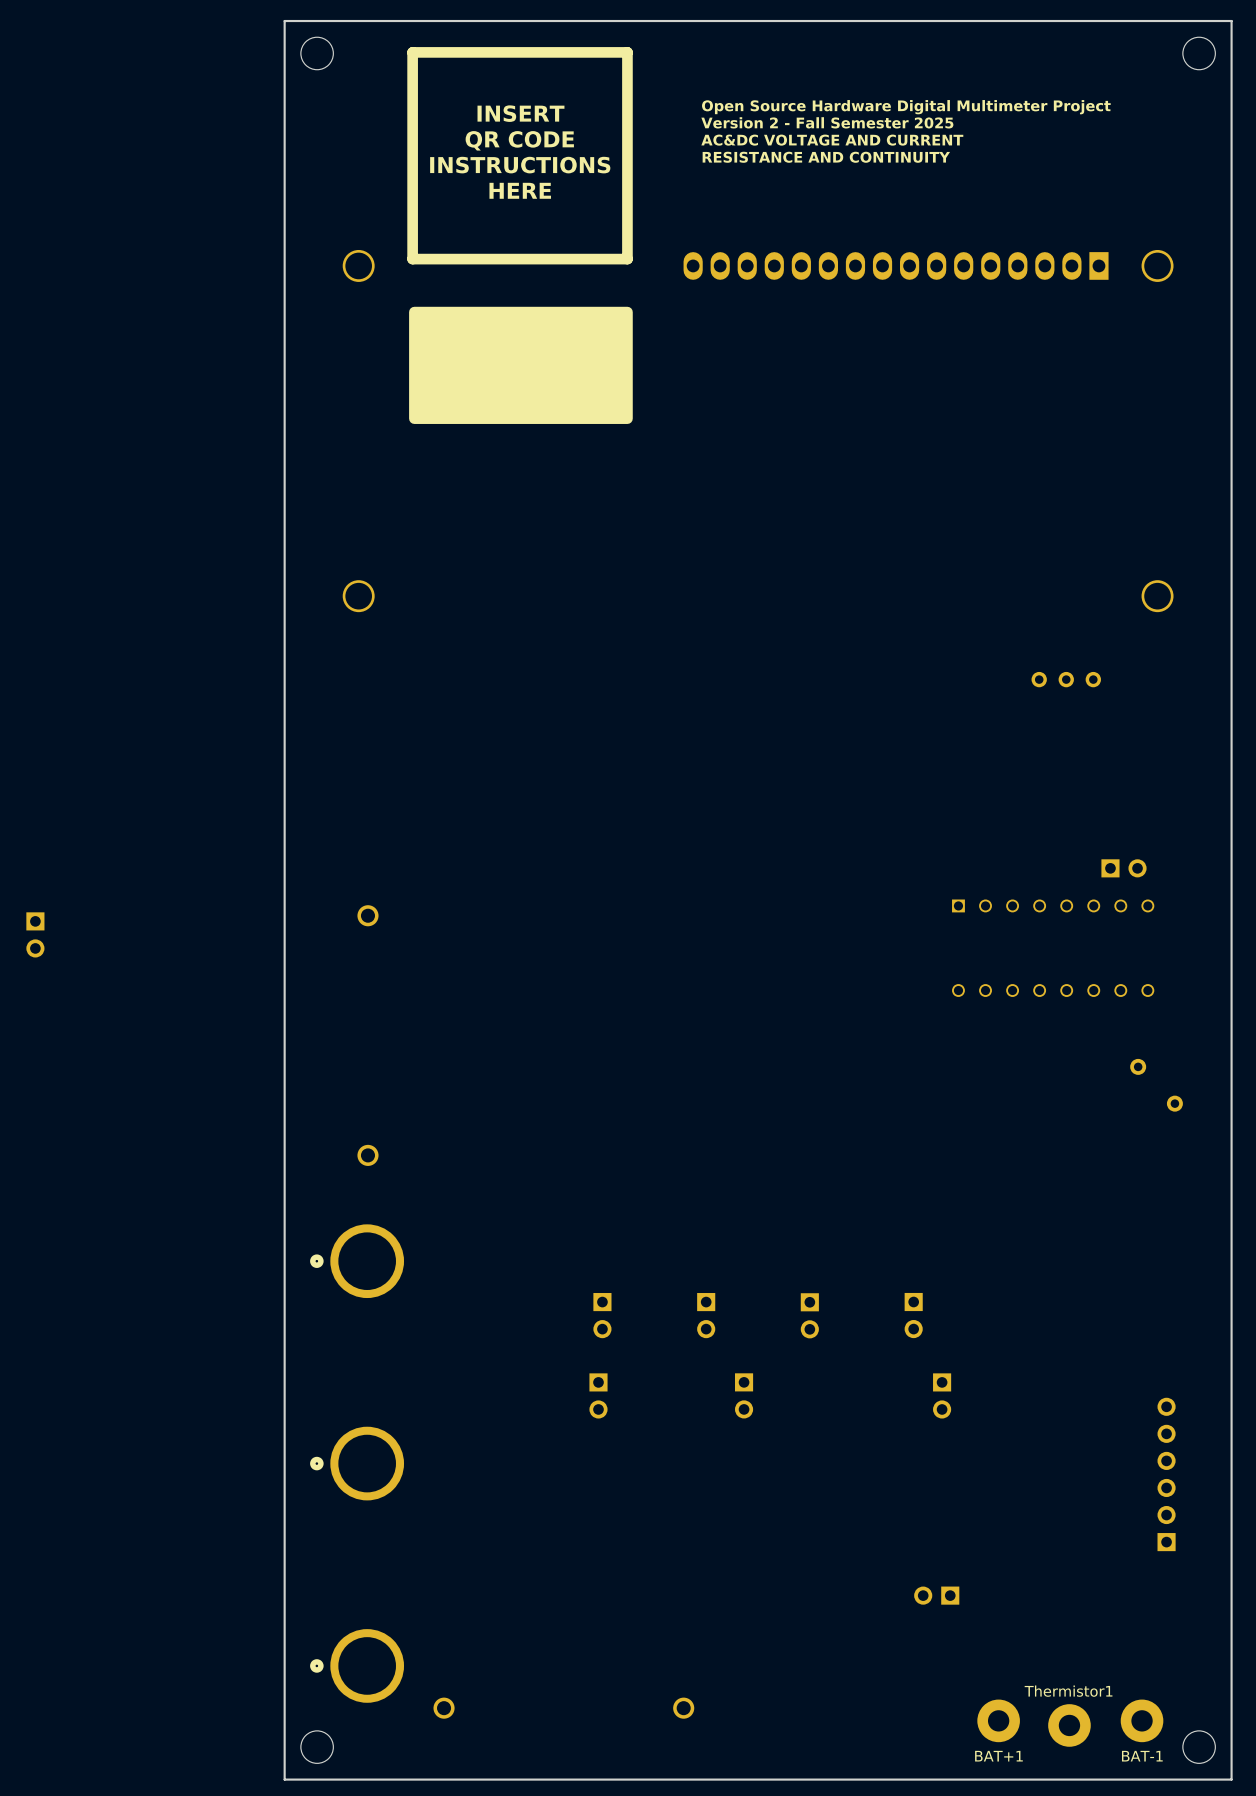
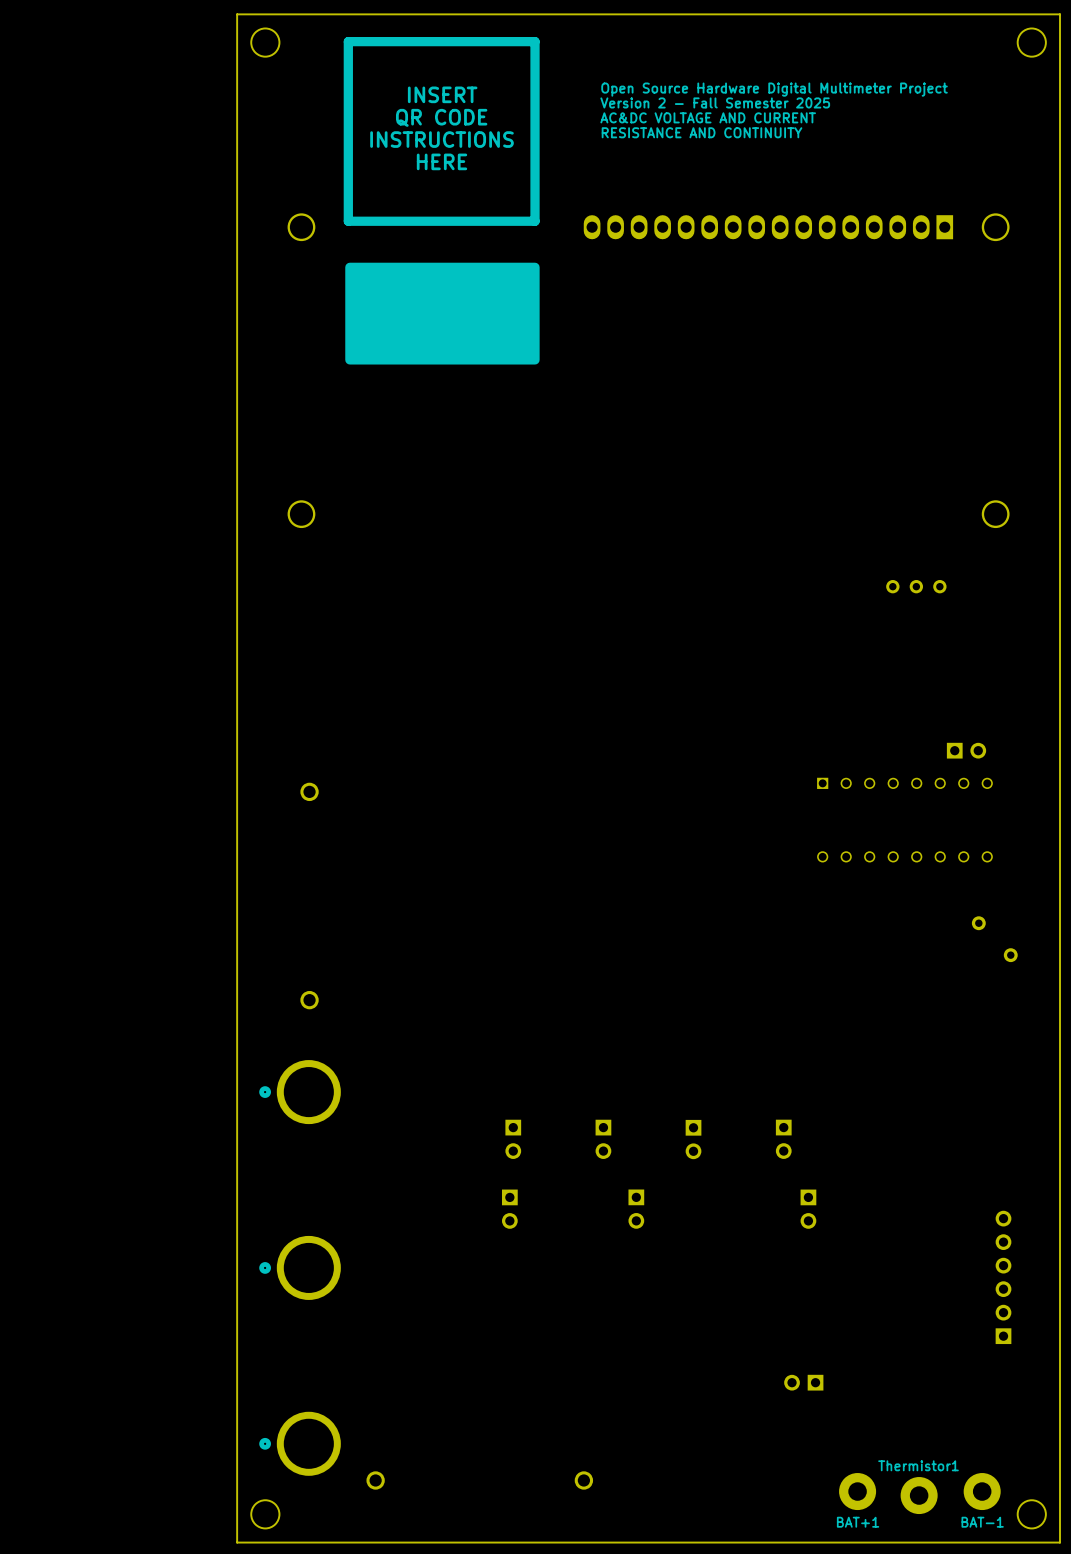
part: (35, 934) -> none

